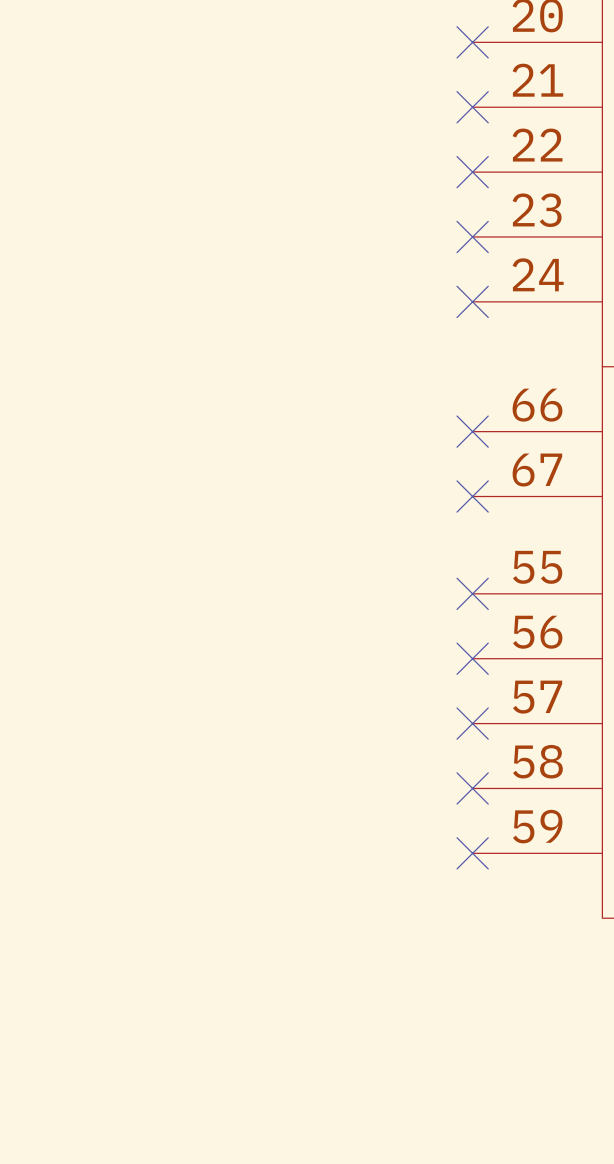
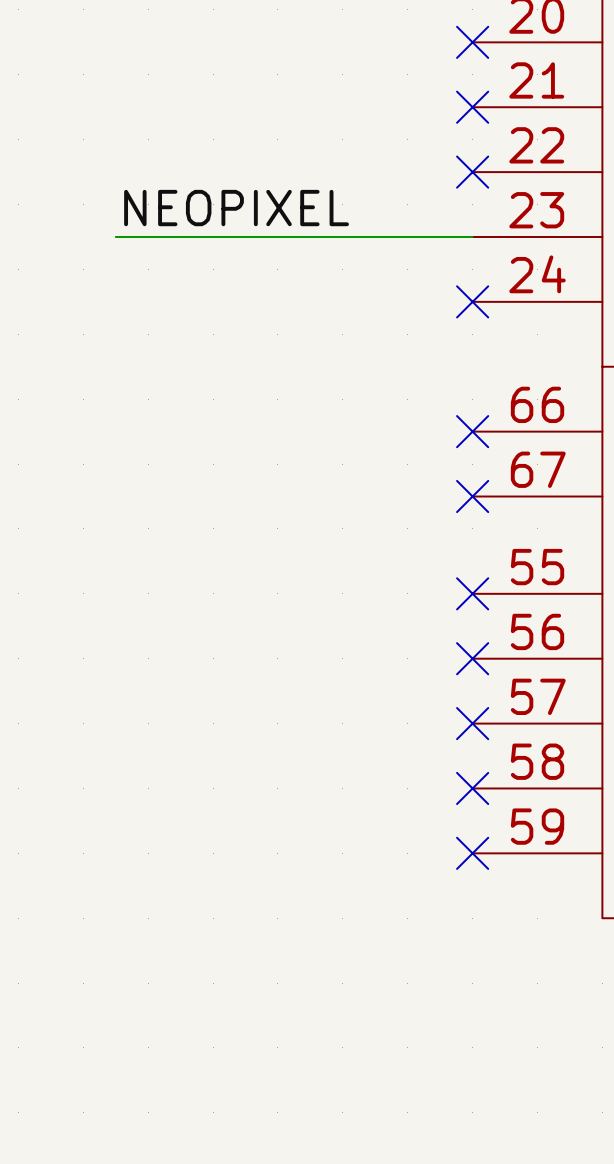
label: none -> NEOPIXEL (236, 208)
wire: none -> (115, 236) (472, 236)
no-connect mark: (472, 236) -> none

